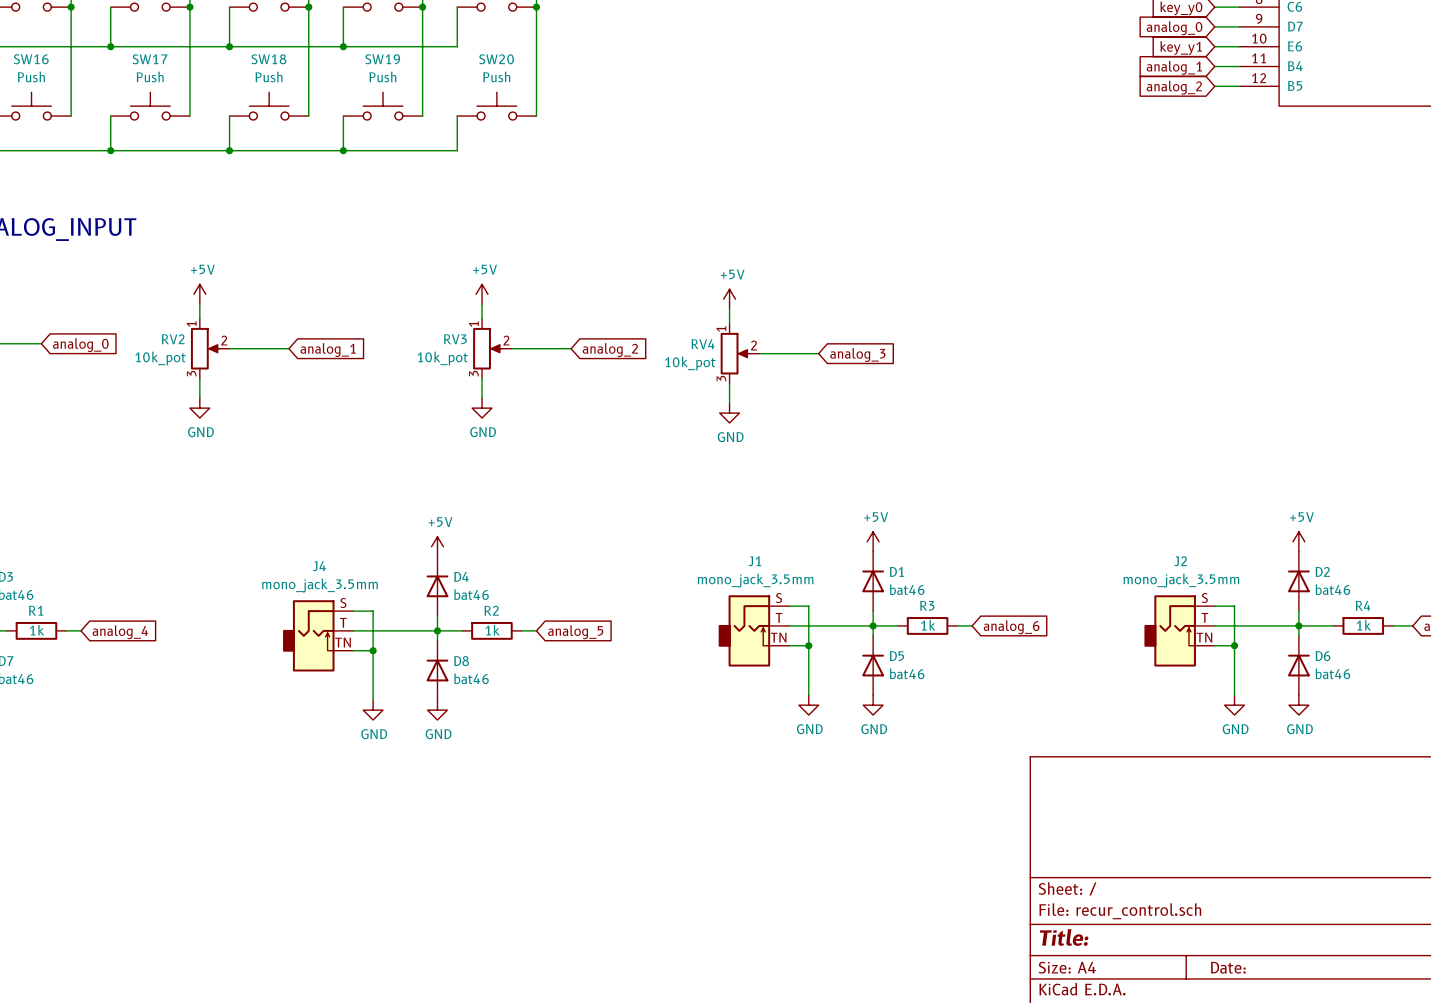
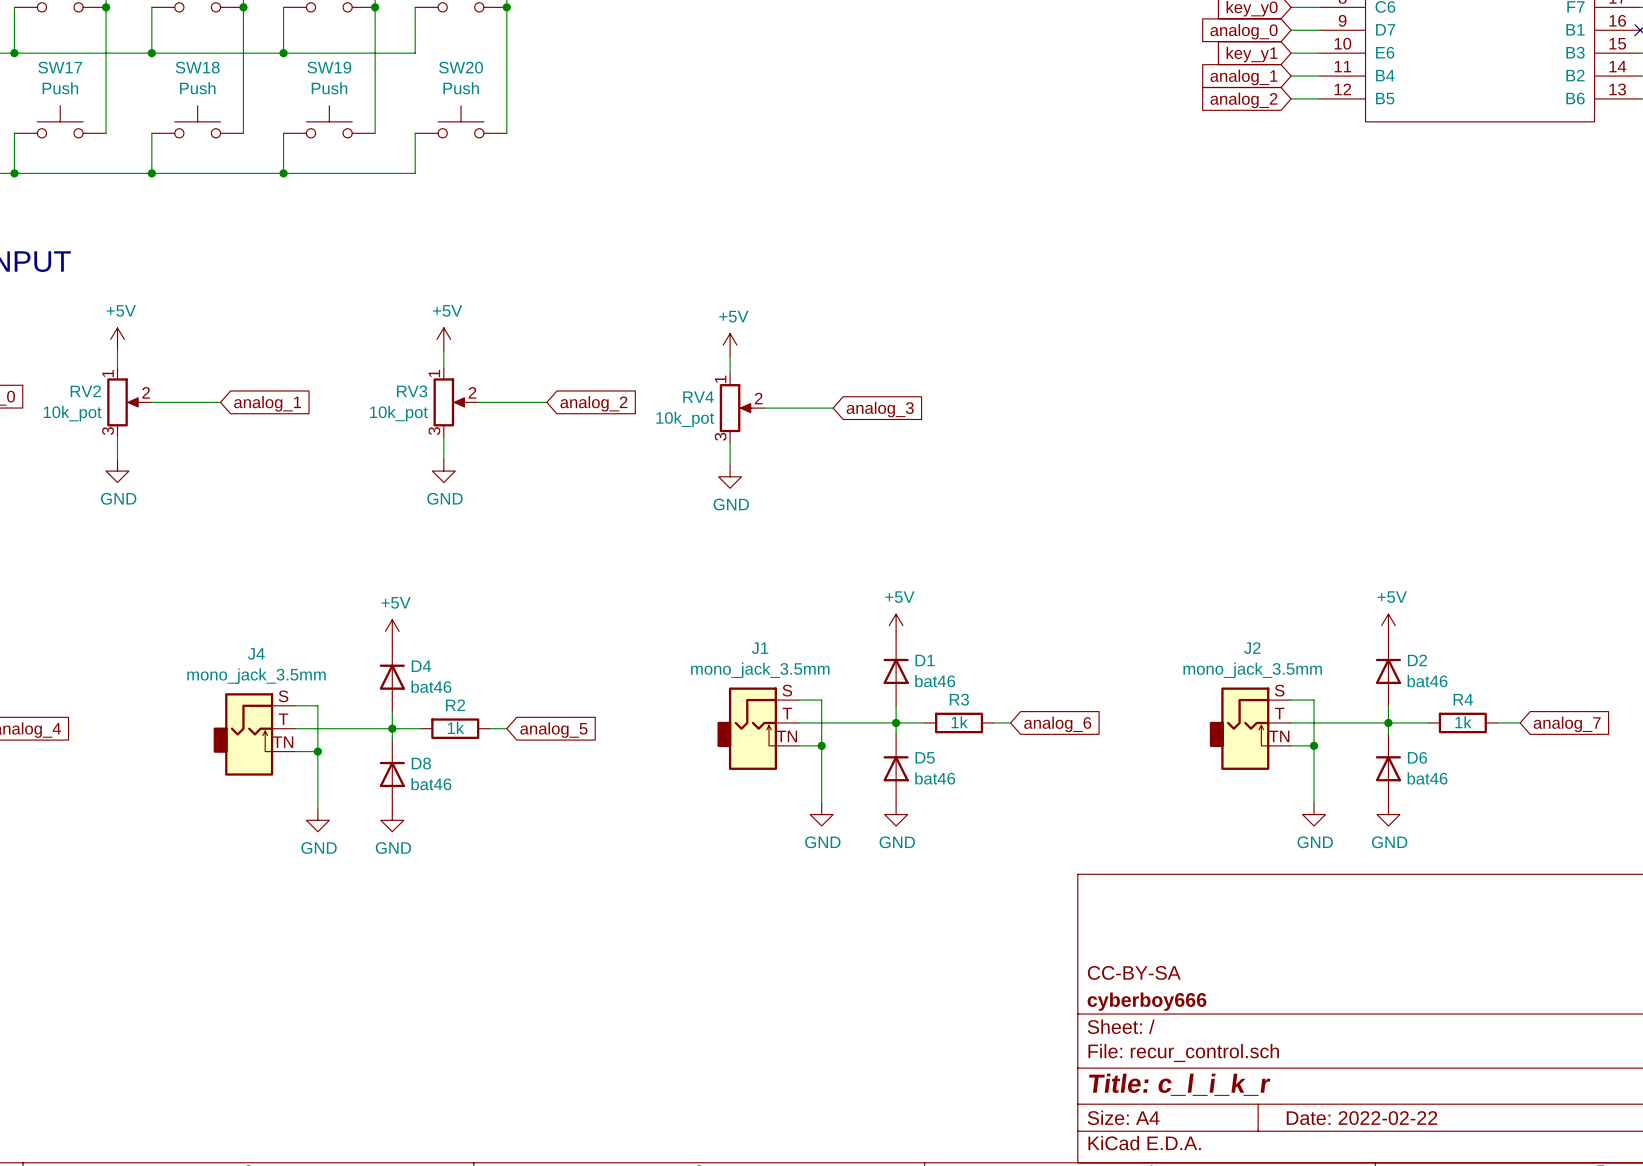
title block: none -> CC-BY-SA (1134, 972)
title block: none -> cyberboy666 (1146, 1001)
title block: Title: (1064, 937) -> Title: c_l_i_k_r (1179, 1084)
title block: Date: (1228, 967) -> Date: 2022-02-22 (1362, 1118)

